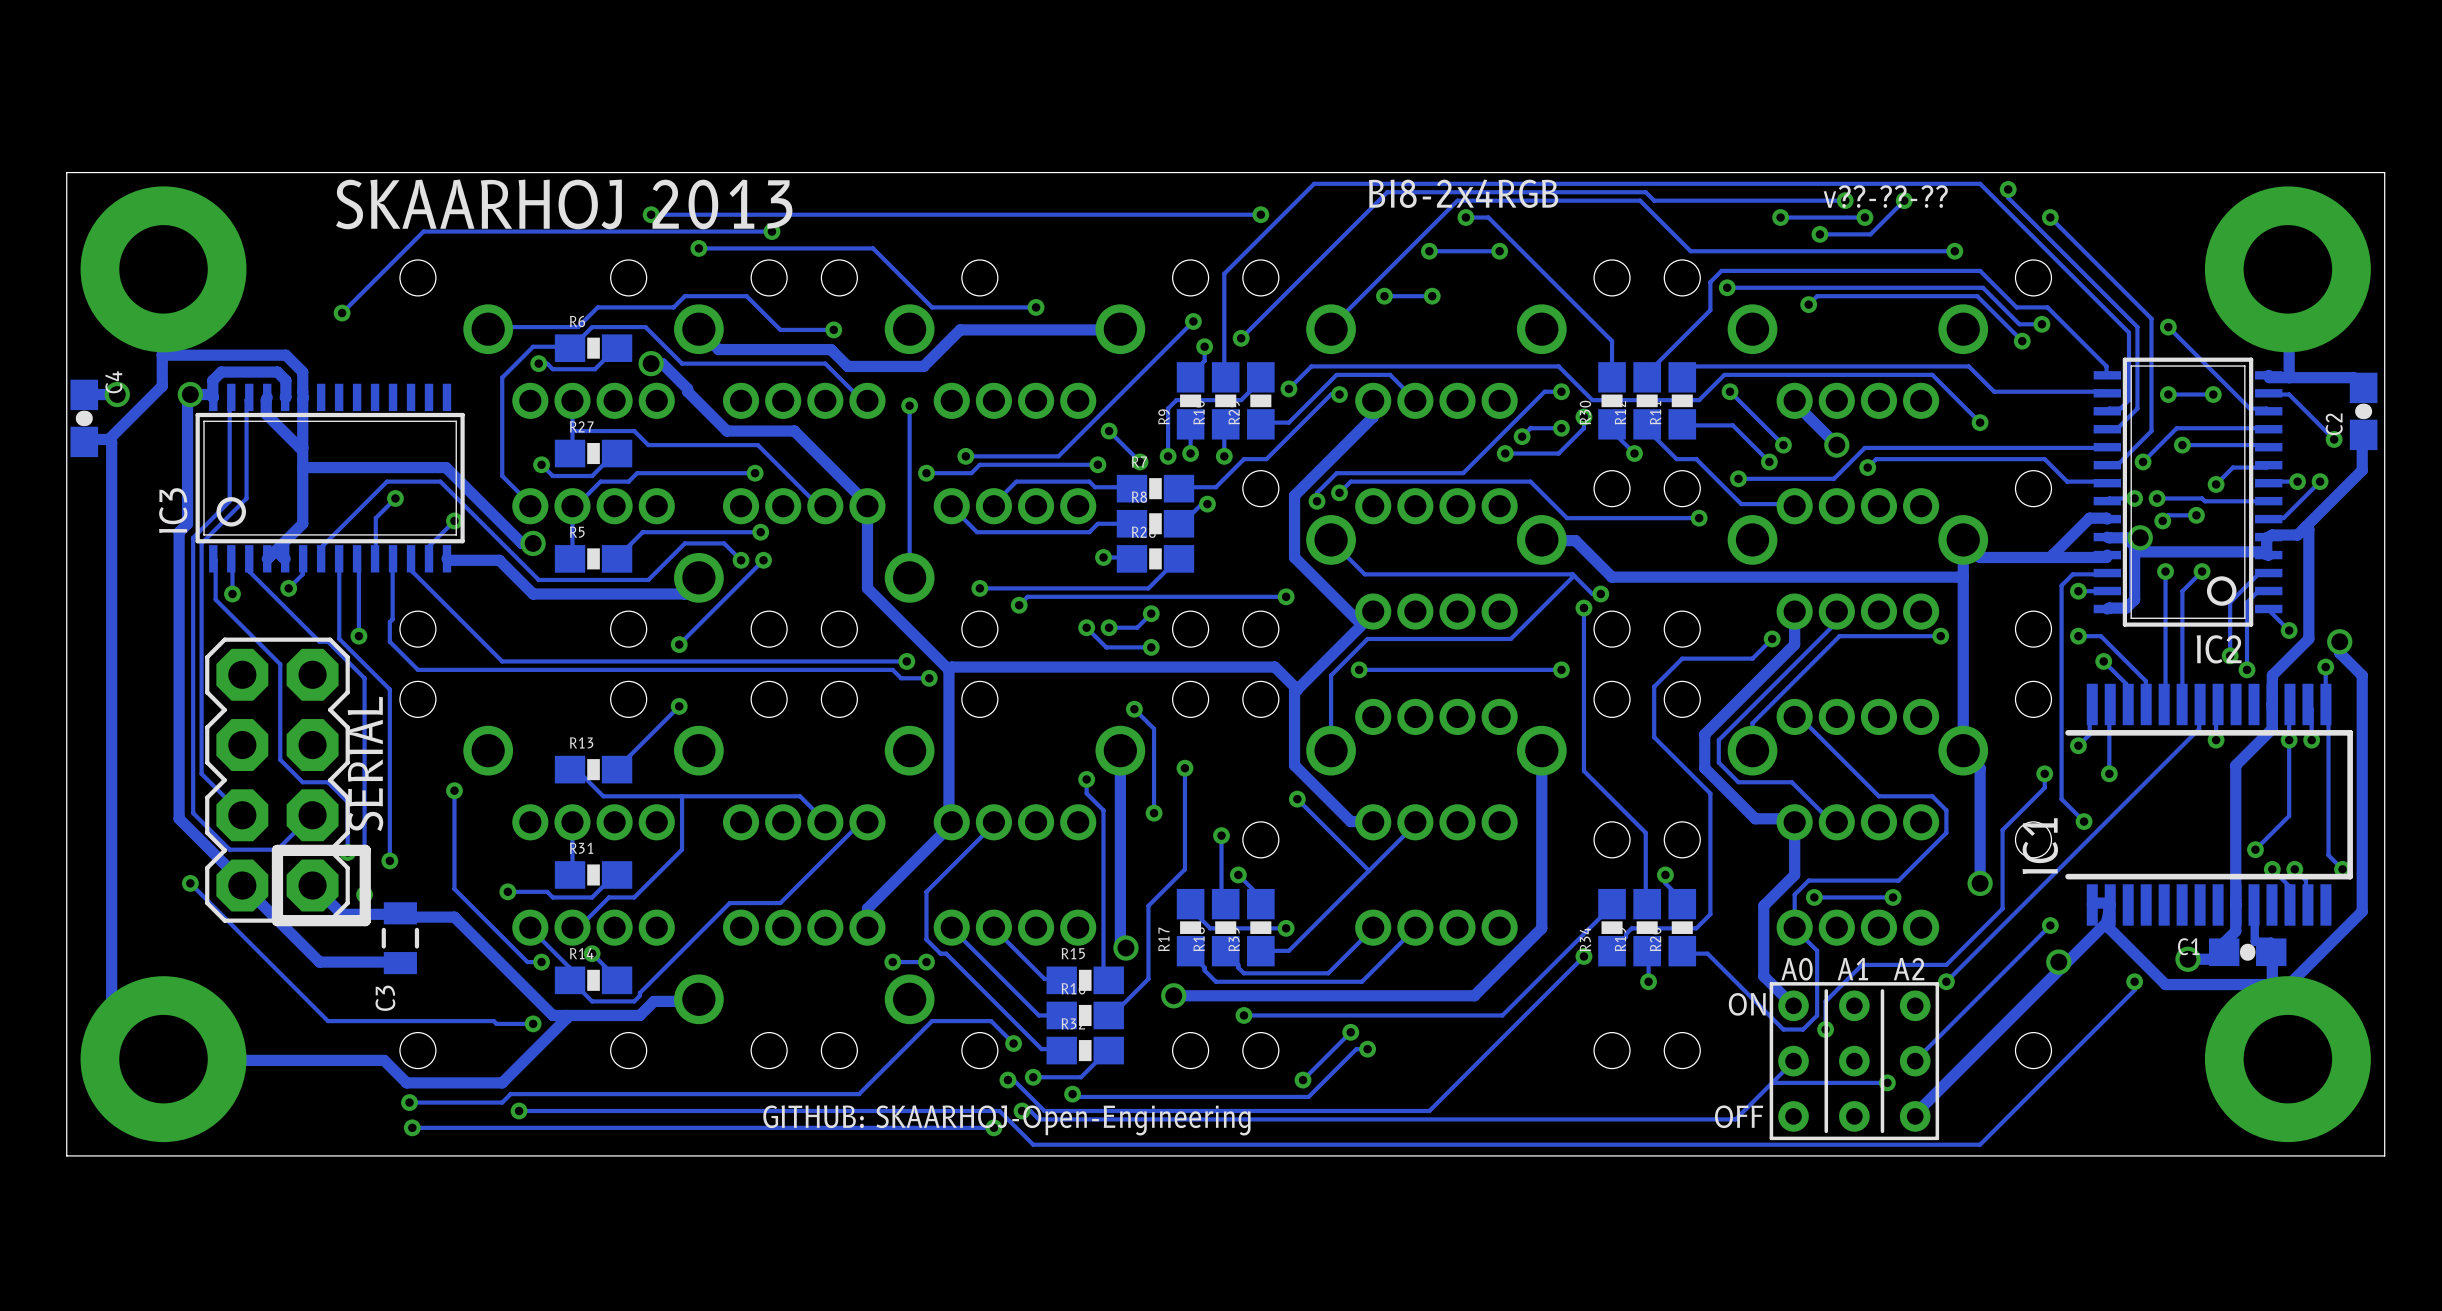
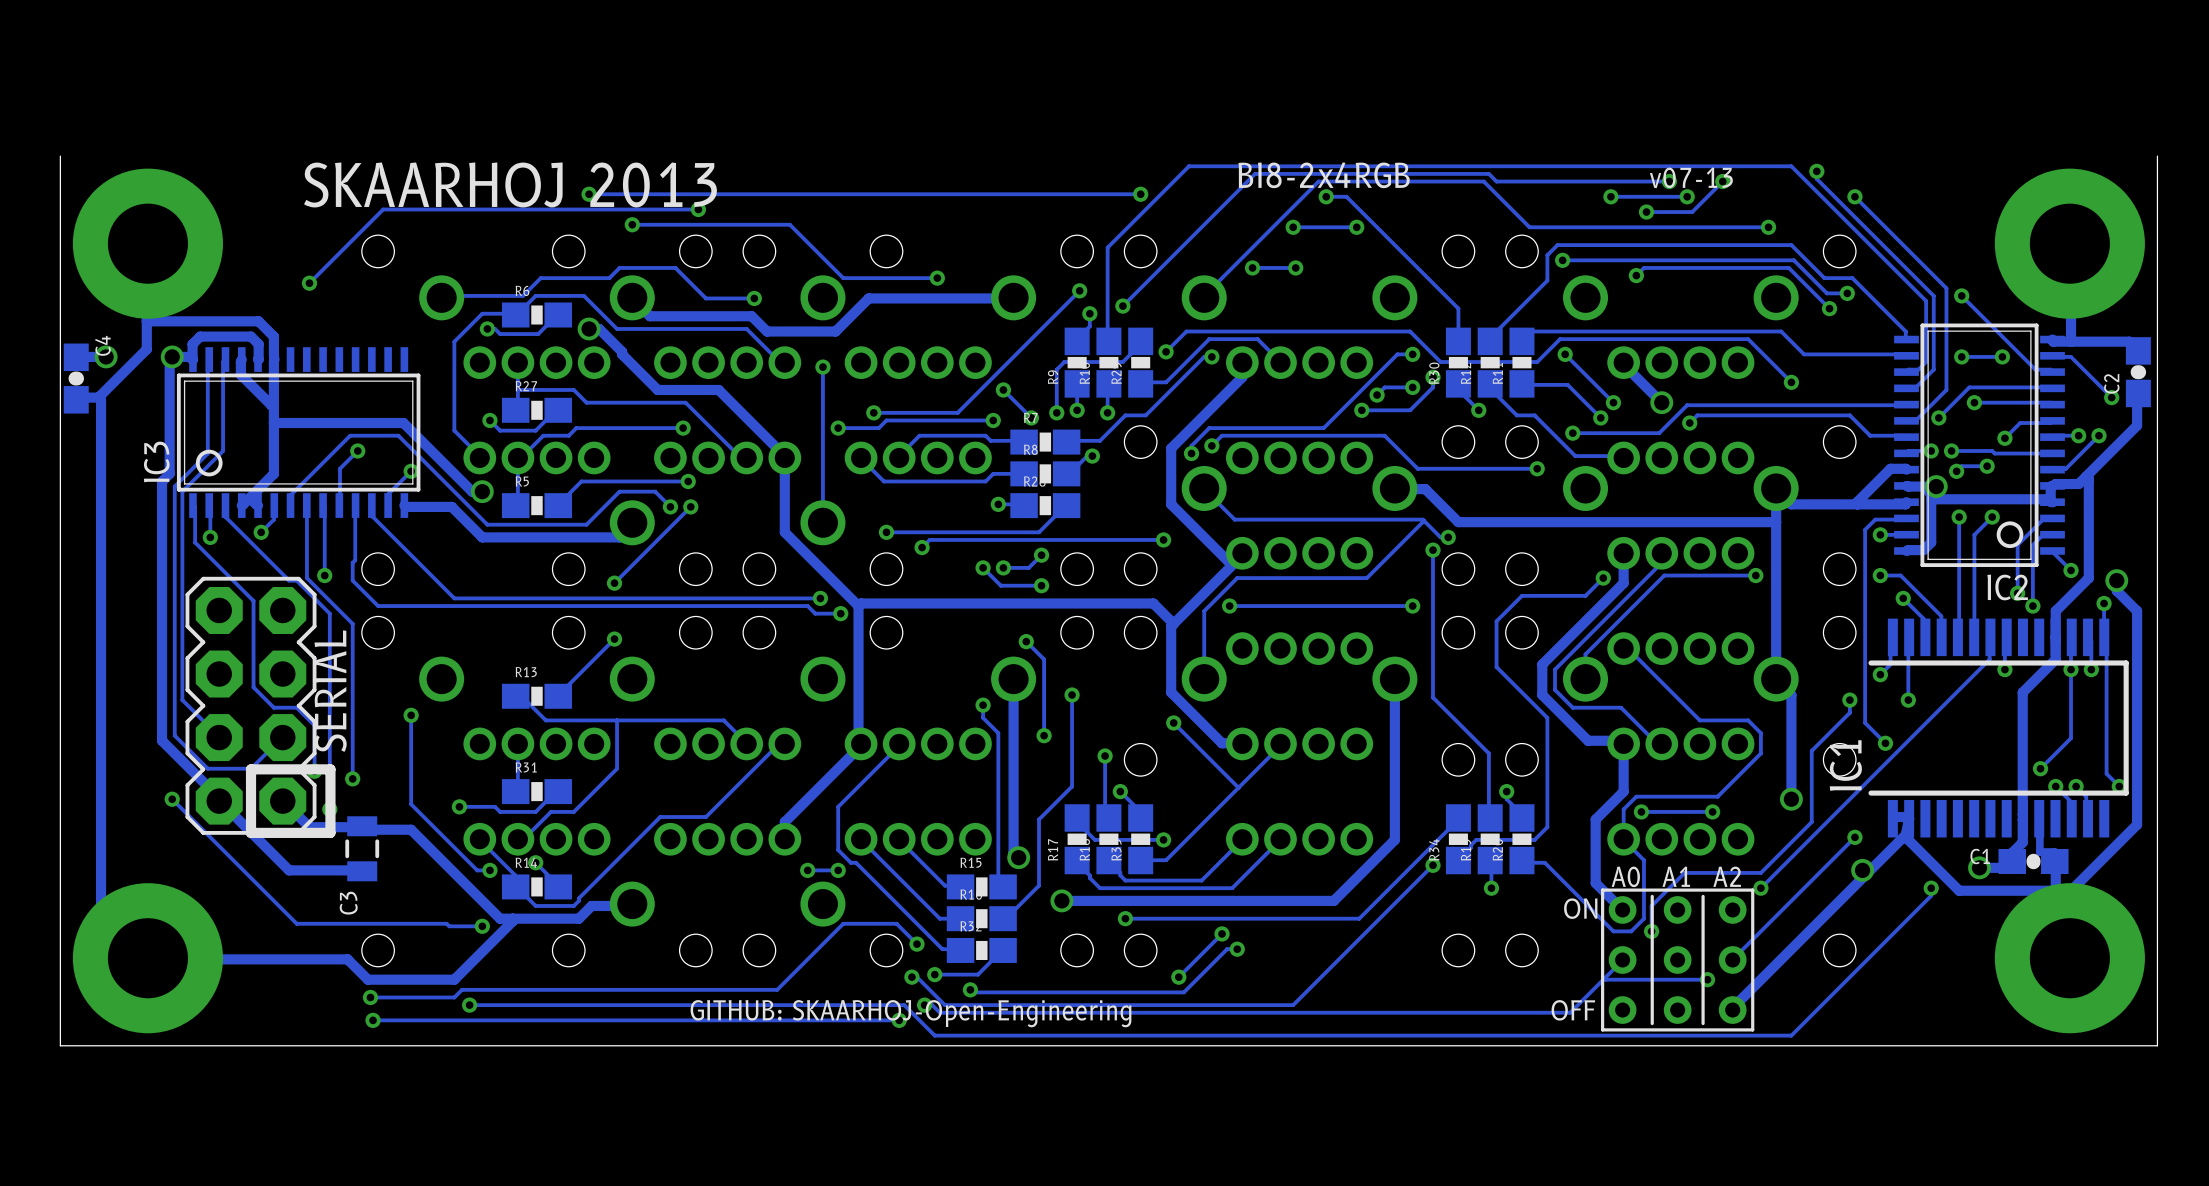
board edge: (2384, 172) (66, 172) -> none
text: v??-??-?? (1885, 196) -> v07-13 (1691, 177)

